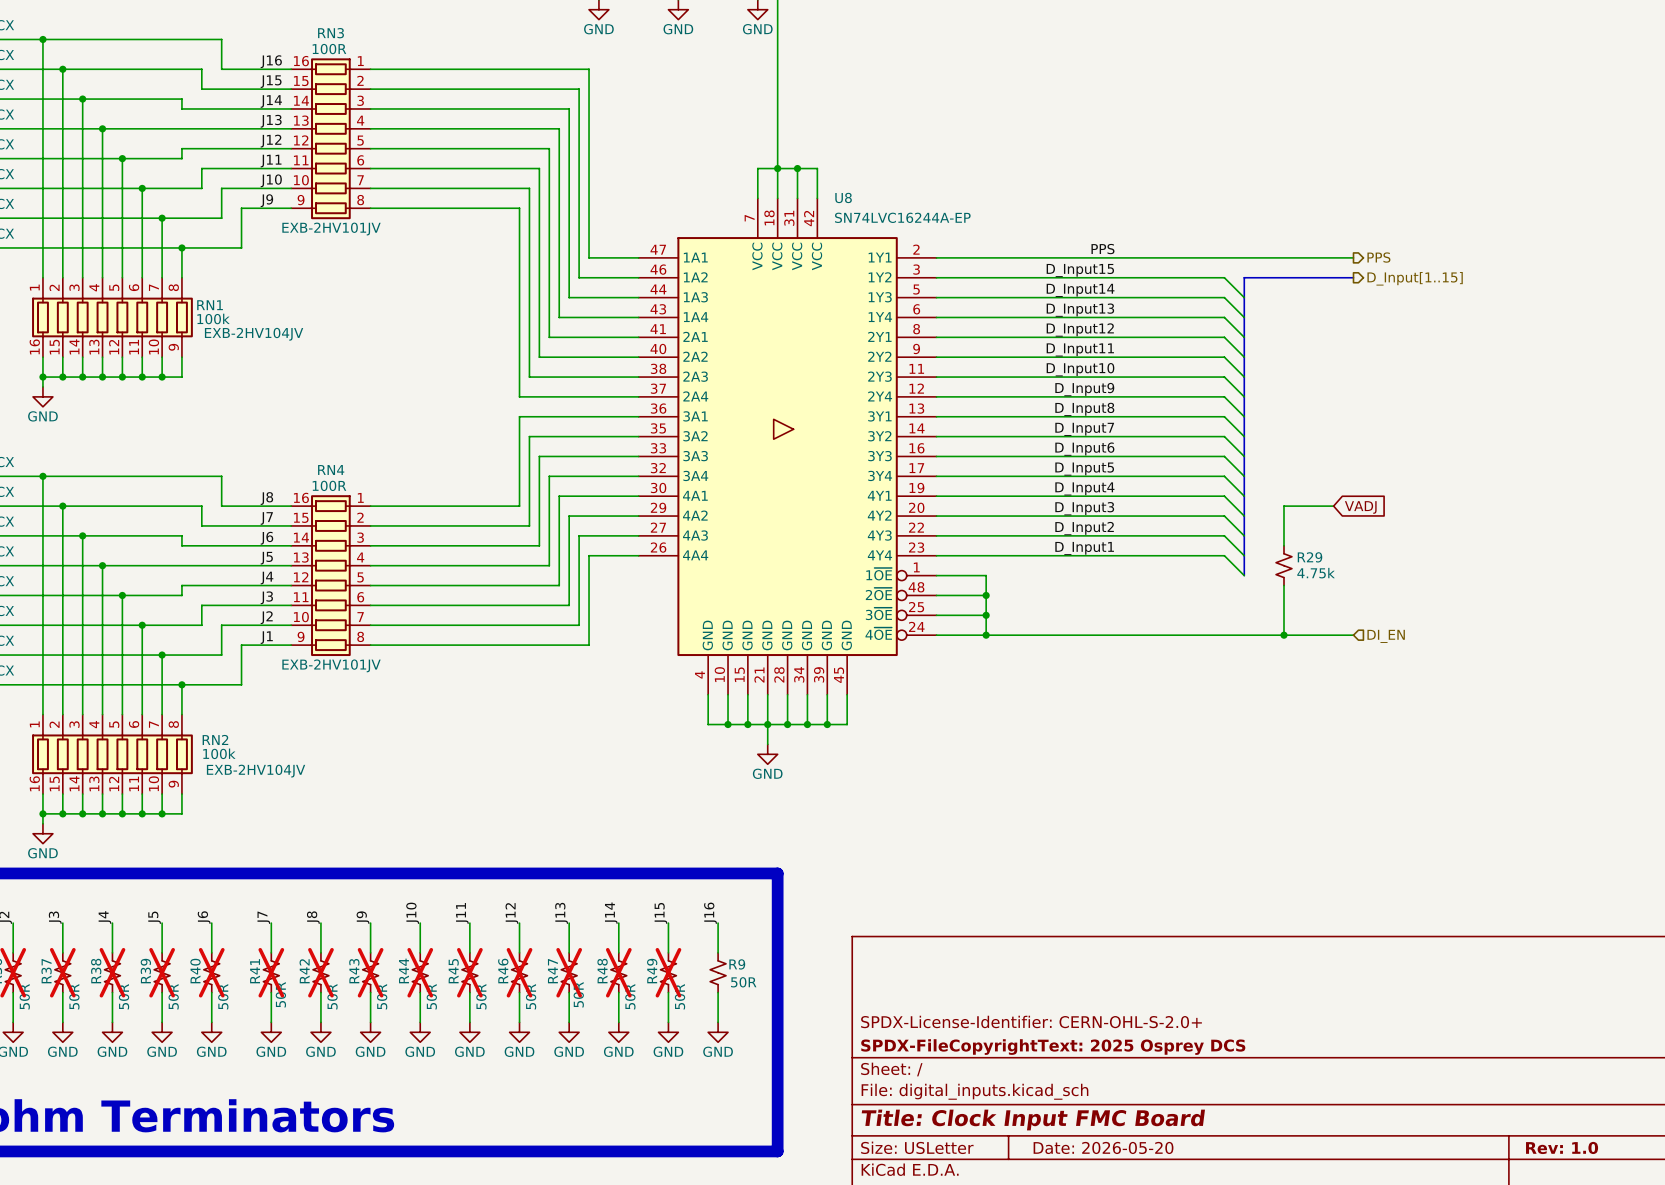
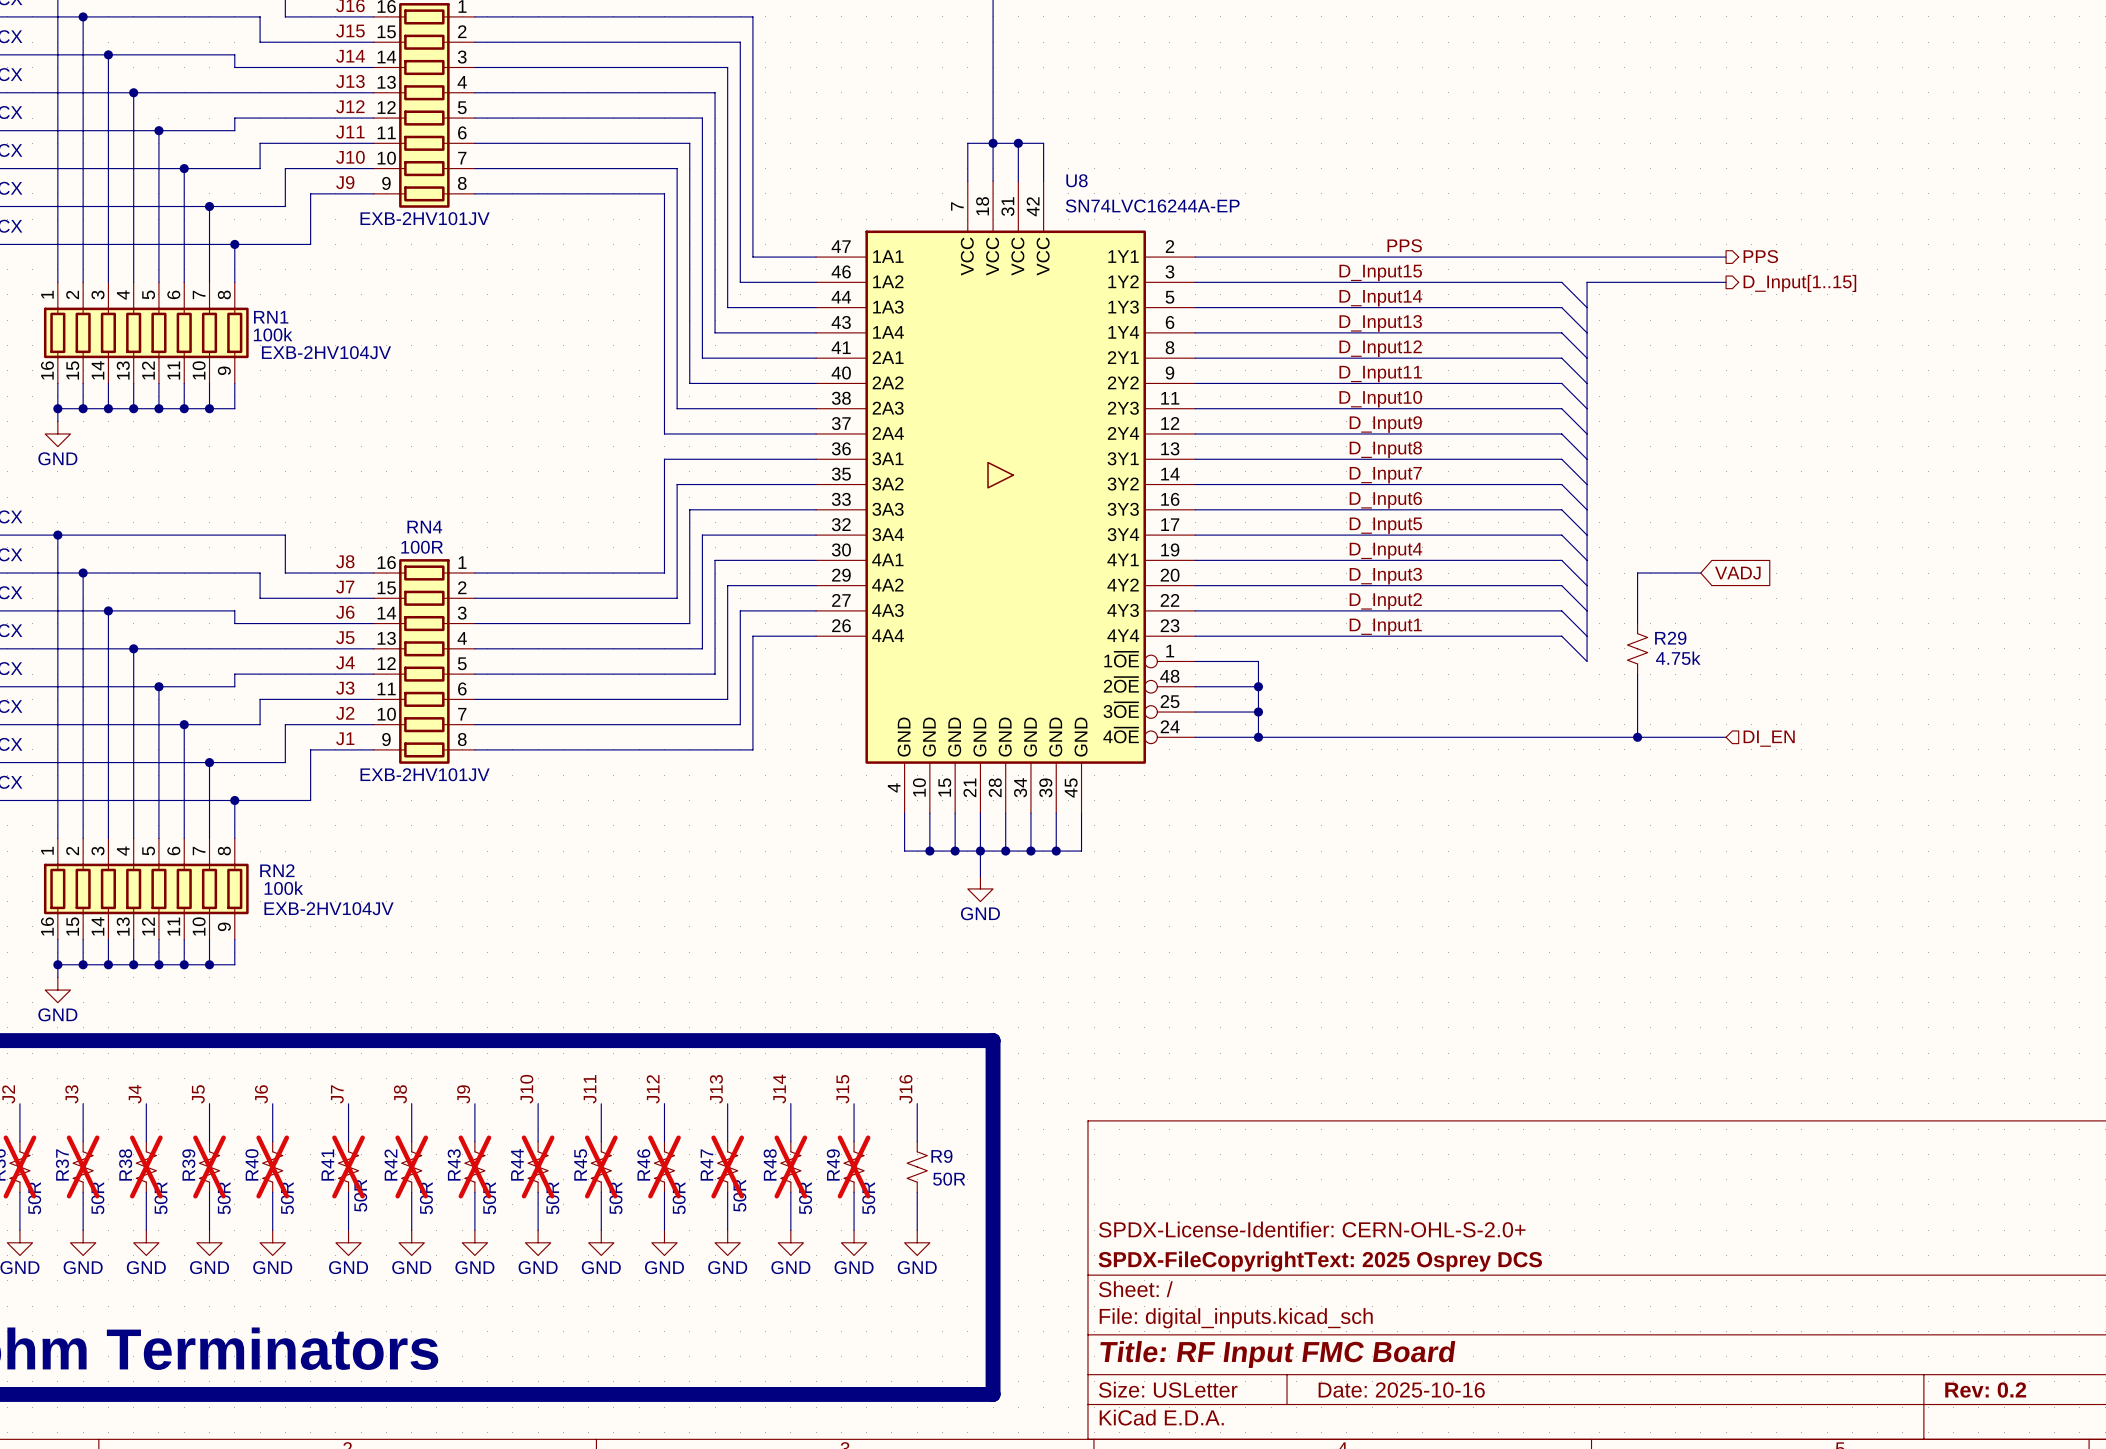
title block: Title: Clock Input FMC Board (1033, 1120) -> Title: RF Input FMC Board (1277, 1354)
title block: Date: 2026-05-20 (1103, 1147) -> Date: 2025-10-16 (1401, 1390)
title block: Rev: 1.0 (1562, 1147) -> Rev: 0.2 (1985, 1390)

